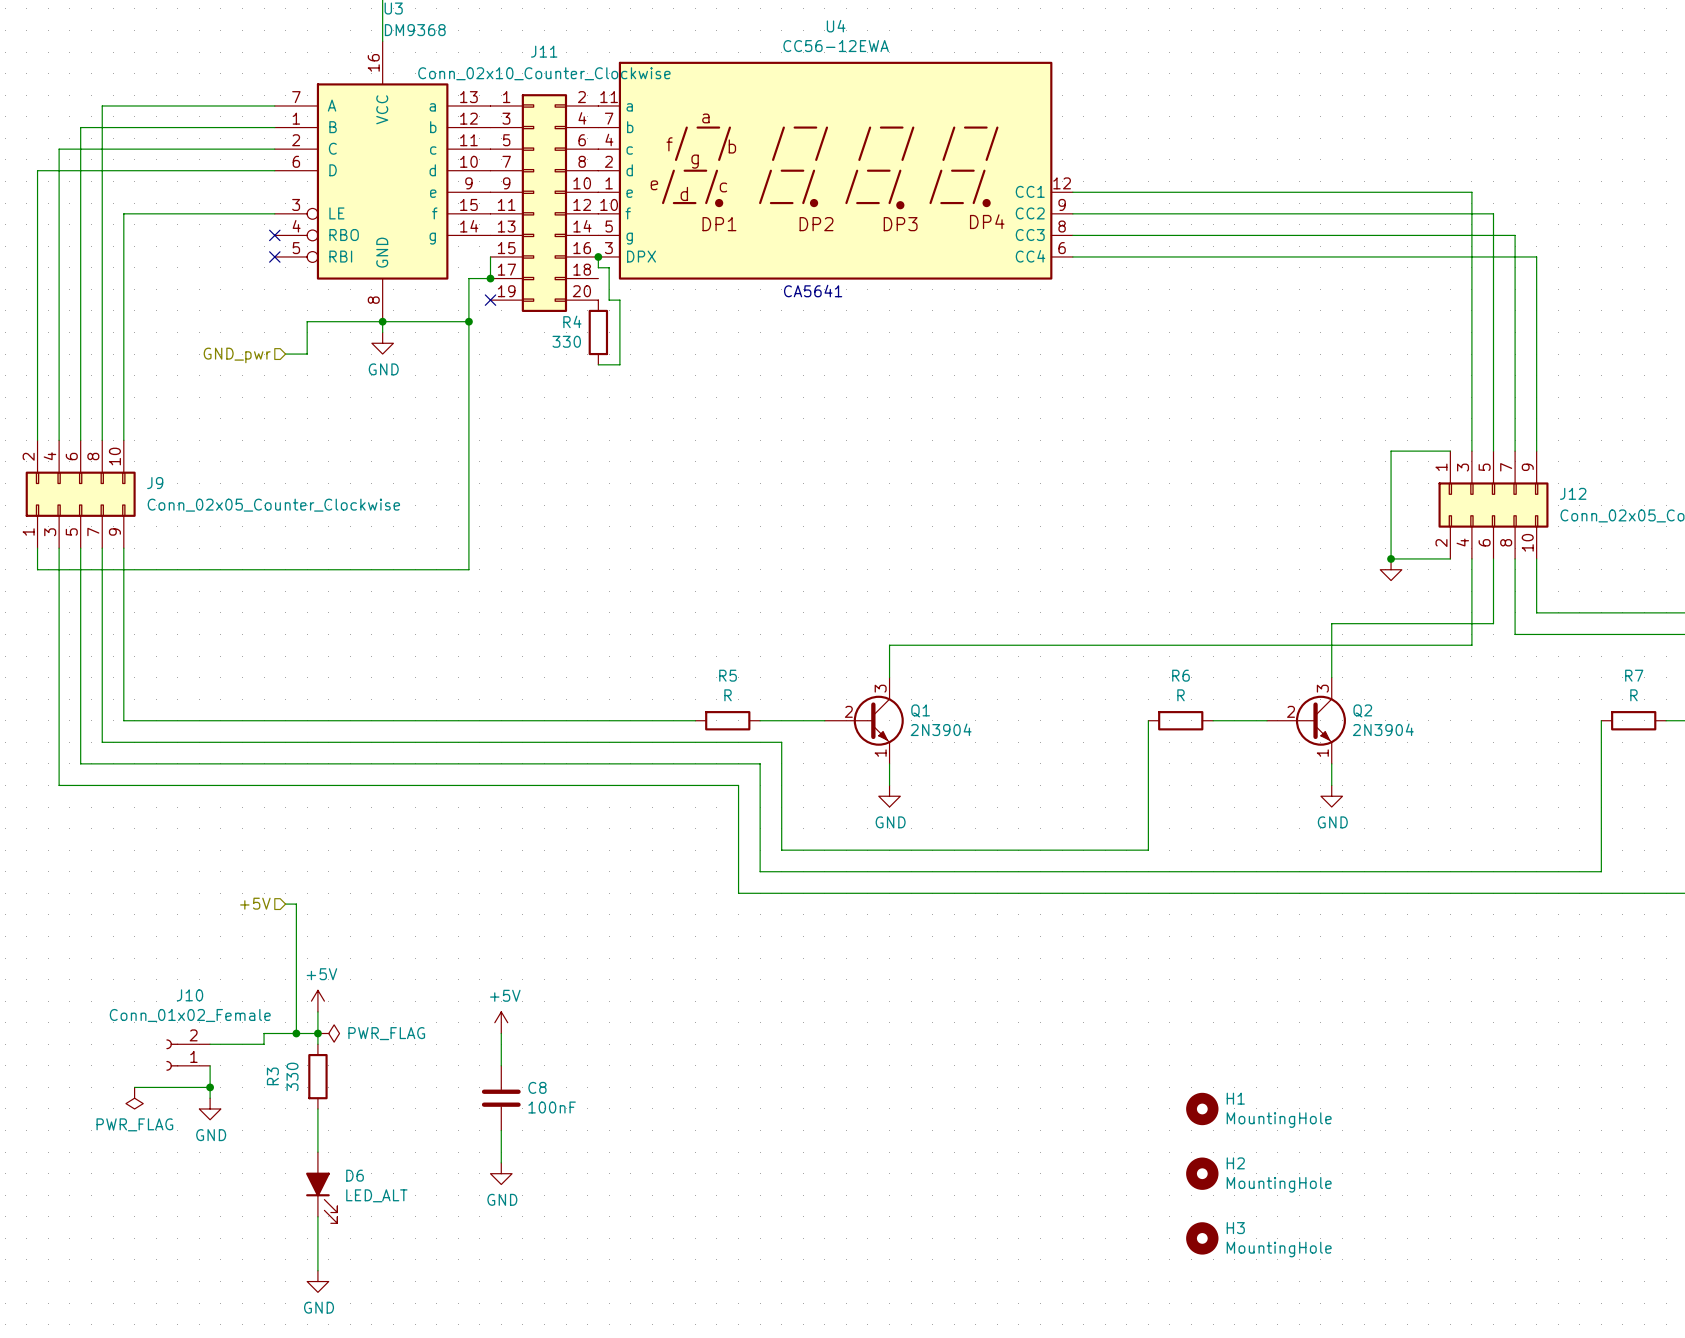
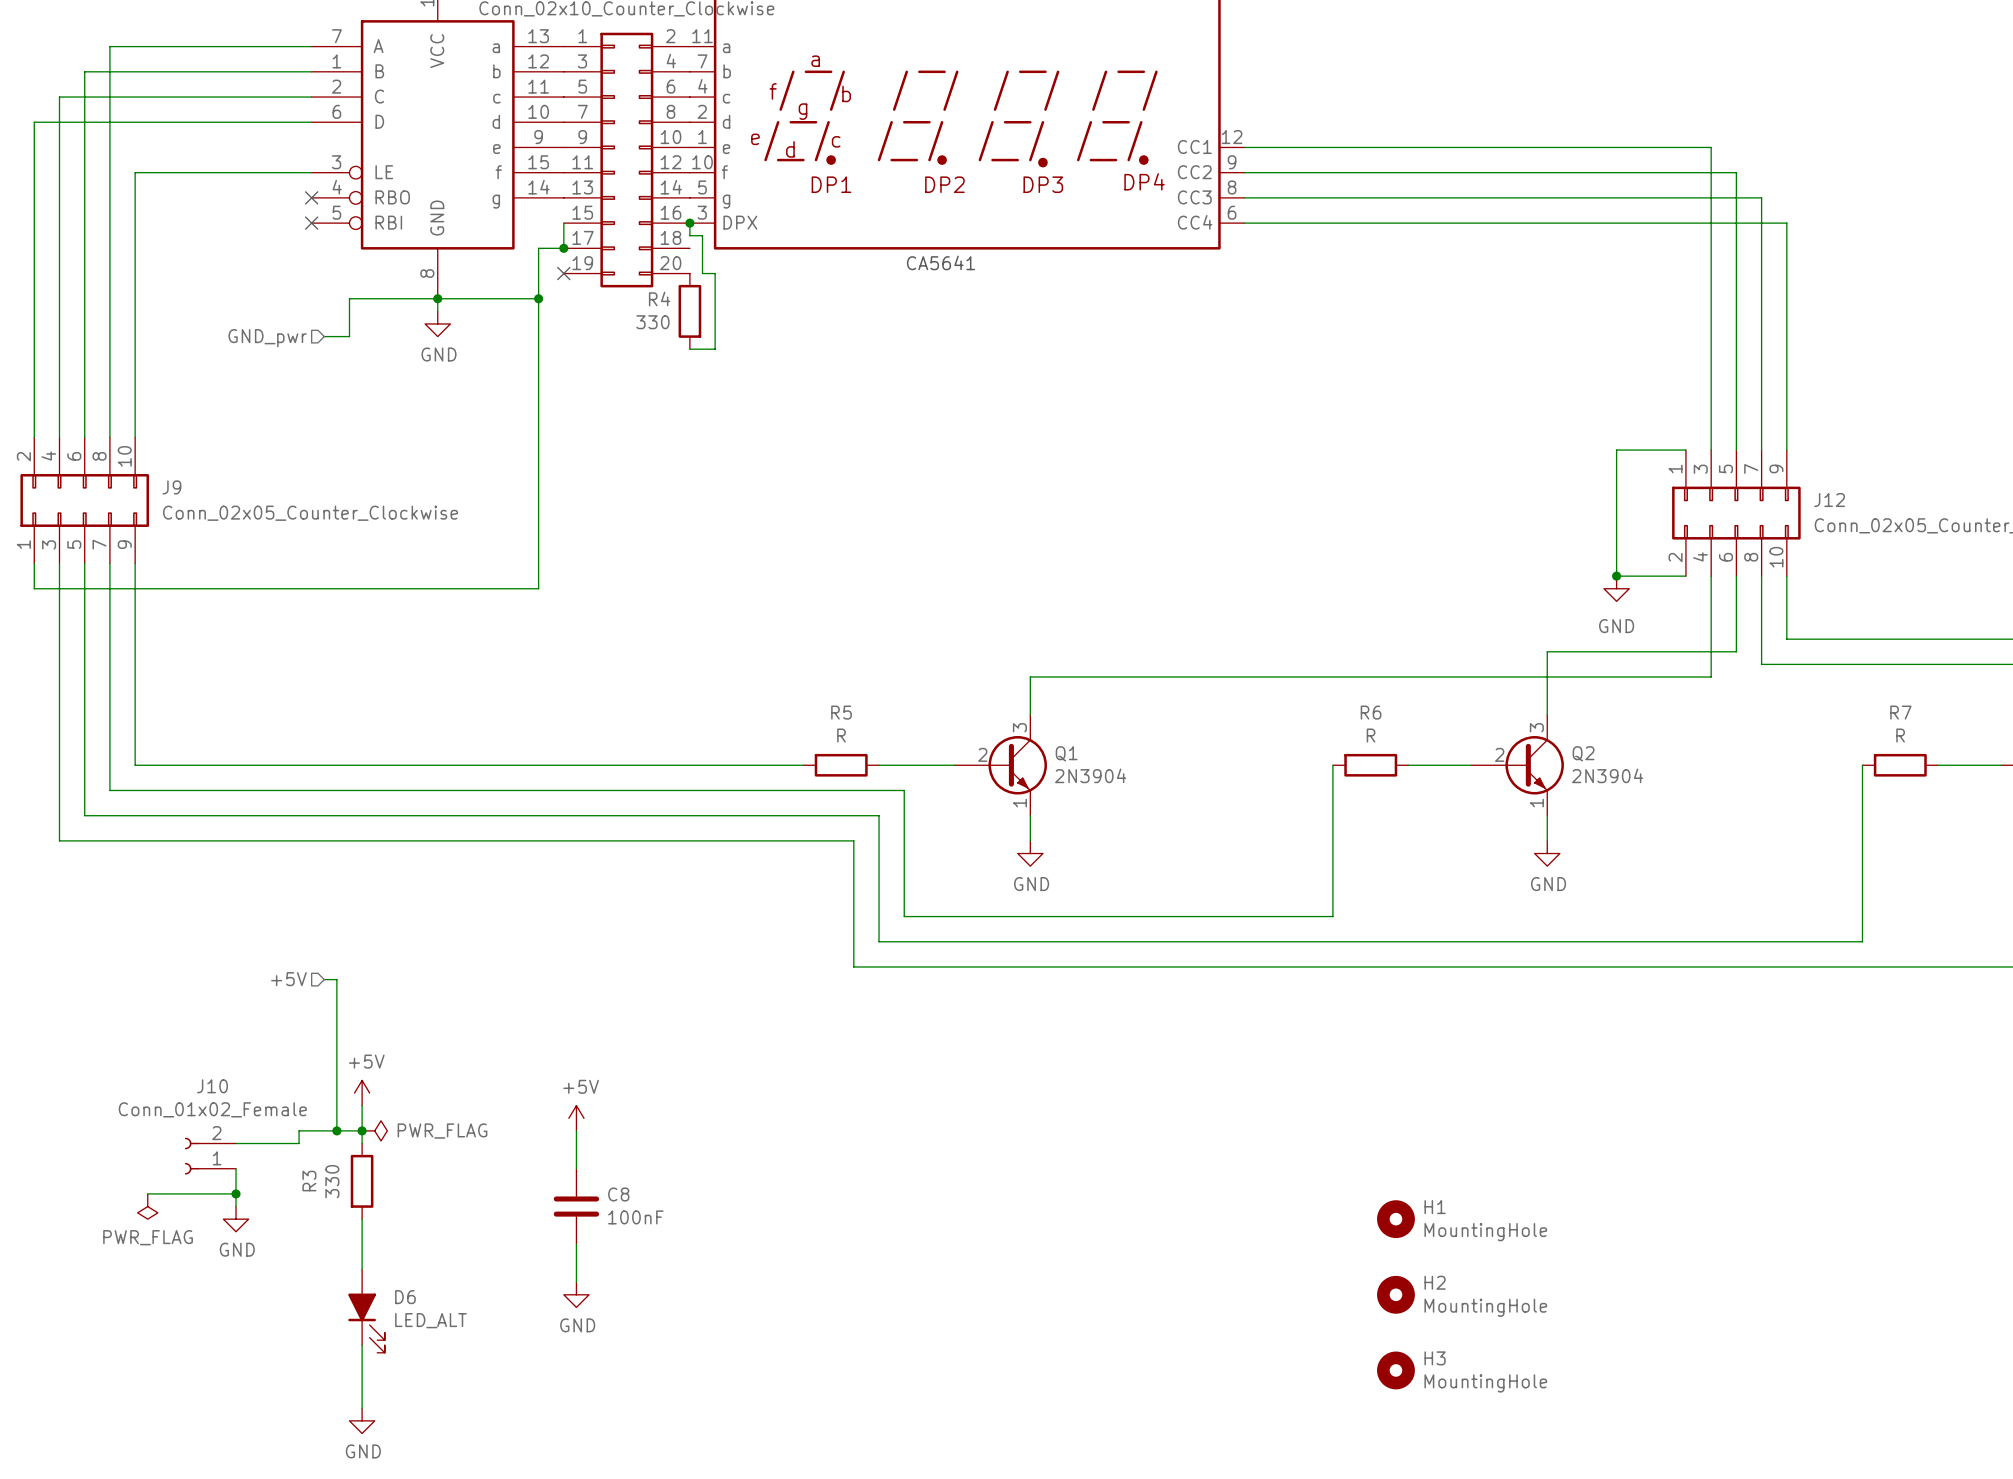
power symbol text: none -> GND (1616, 626)

